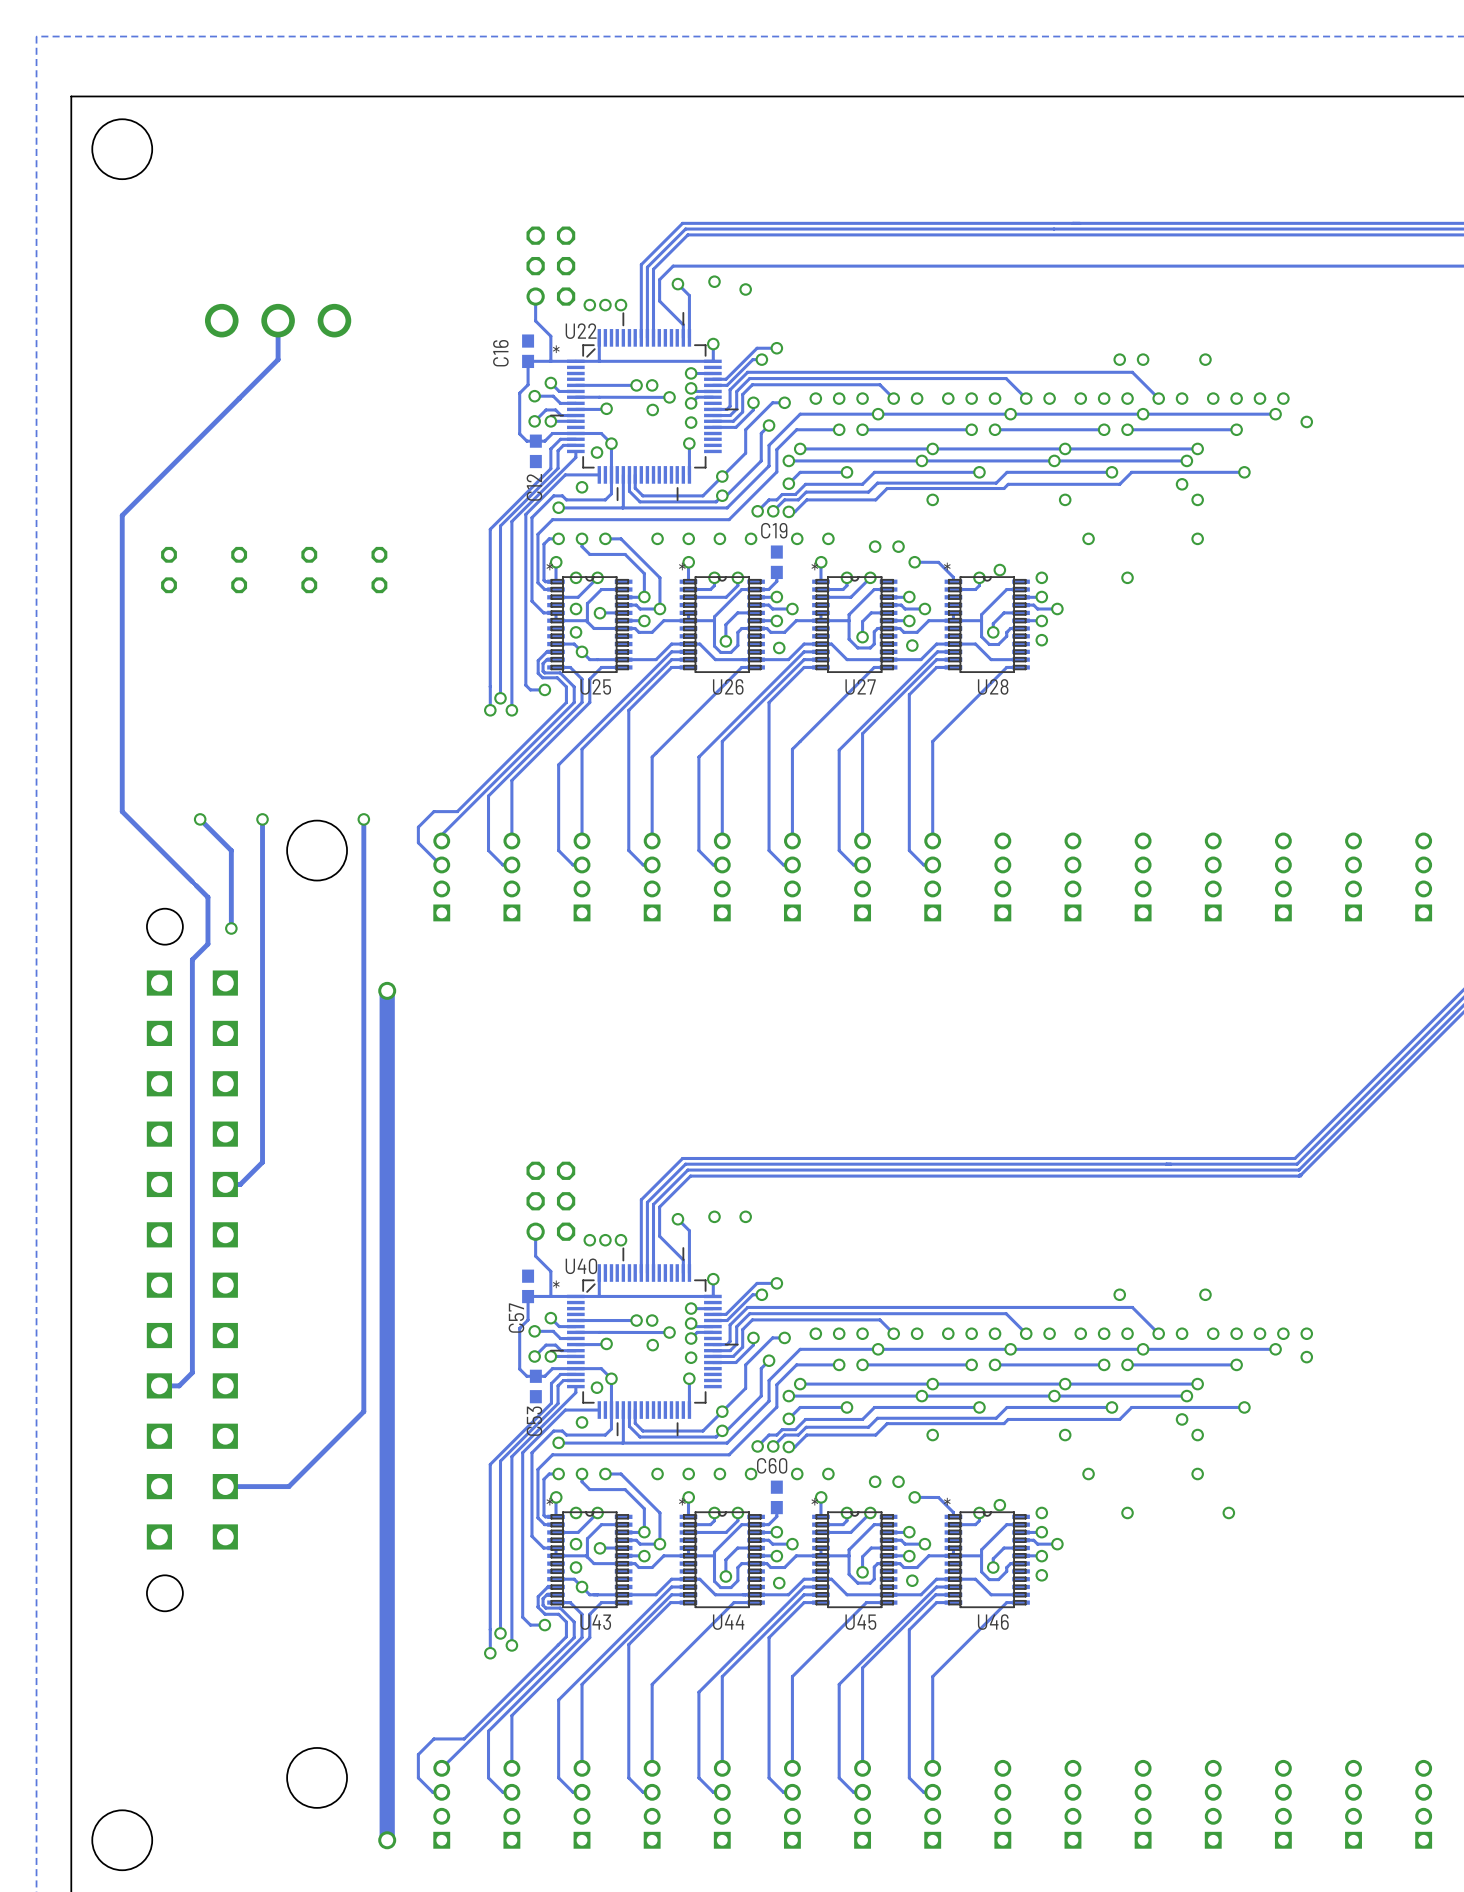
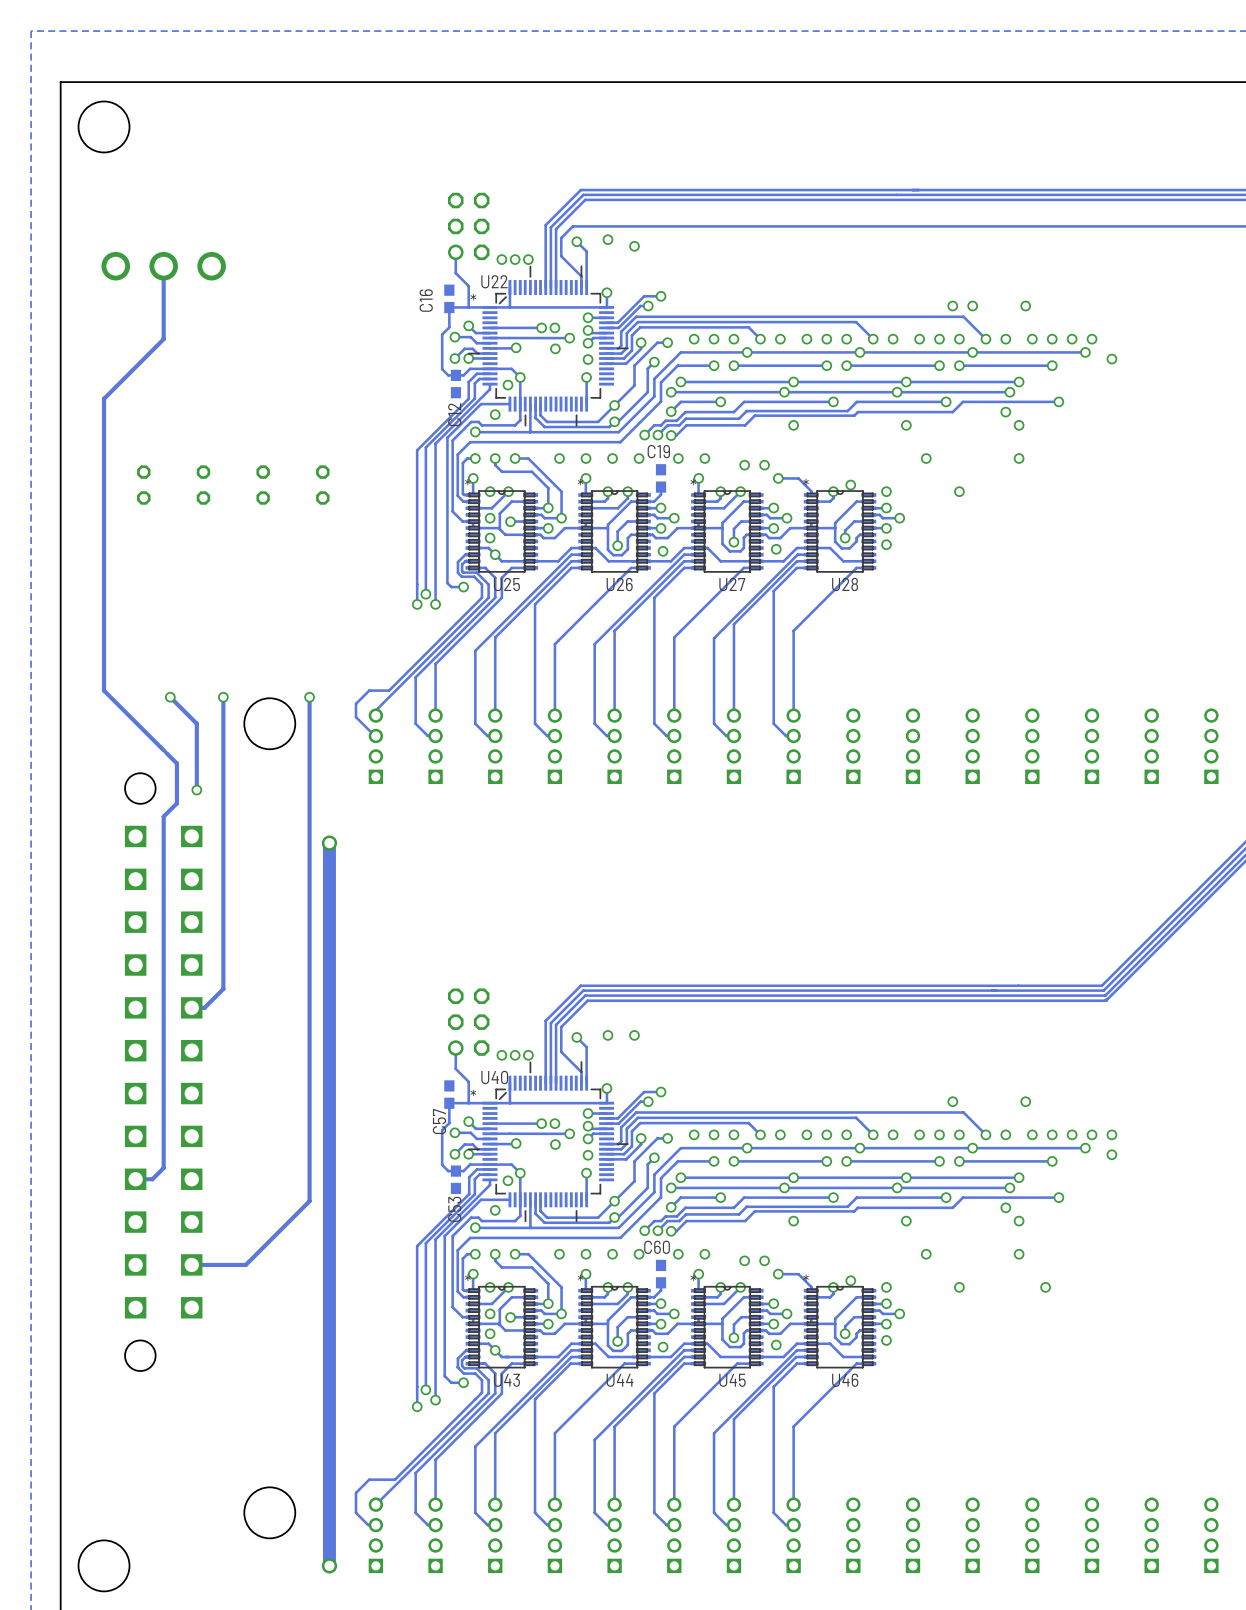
track: (278, 320) (278, 359) (122, 515) -> (163, 266) (163, 339) (104, 398) (104, 438)
part position: (278, 320) -> (163, 266)

